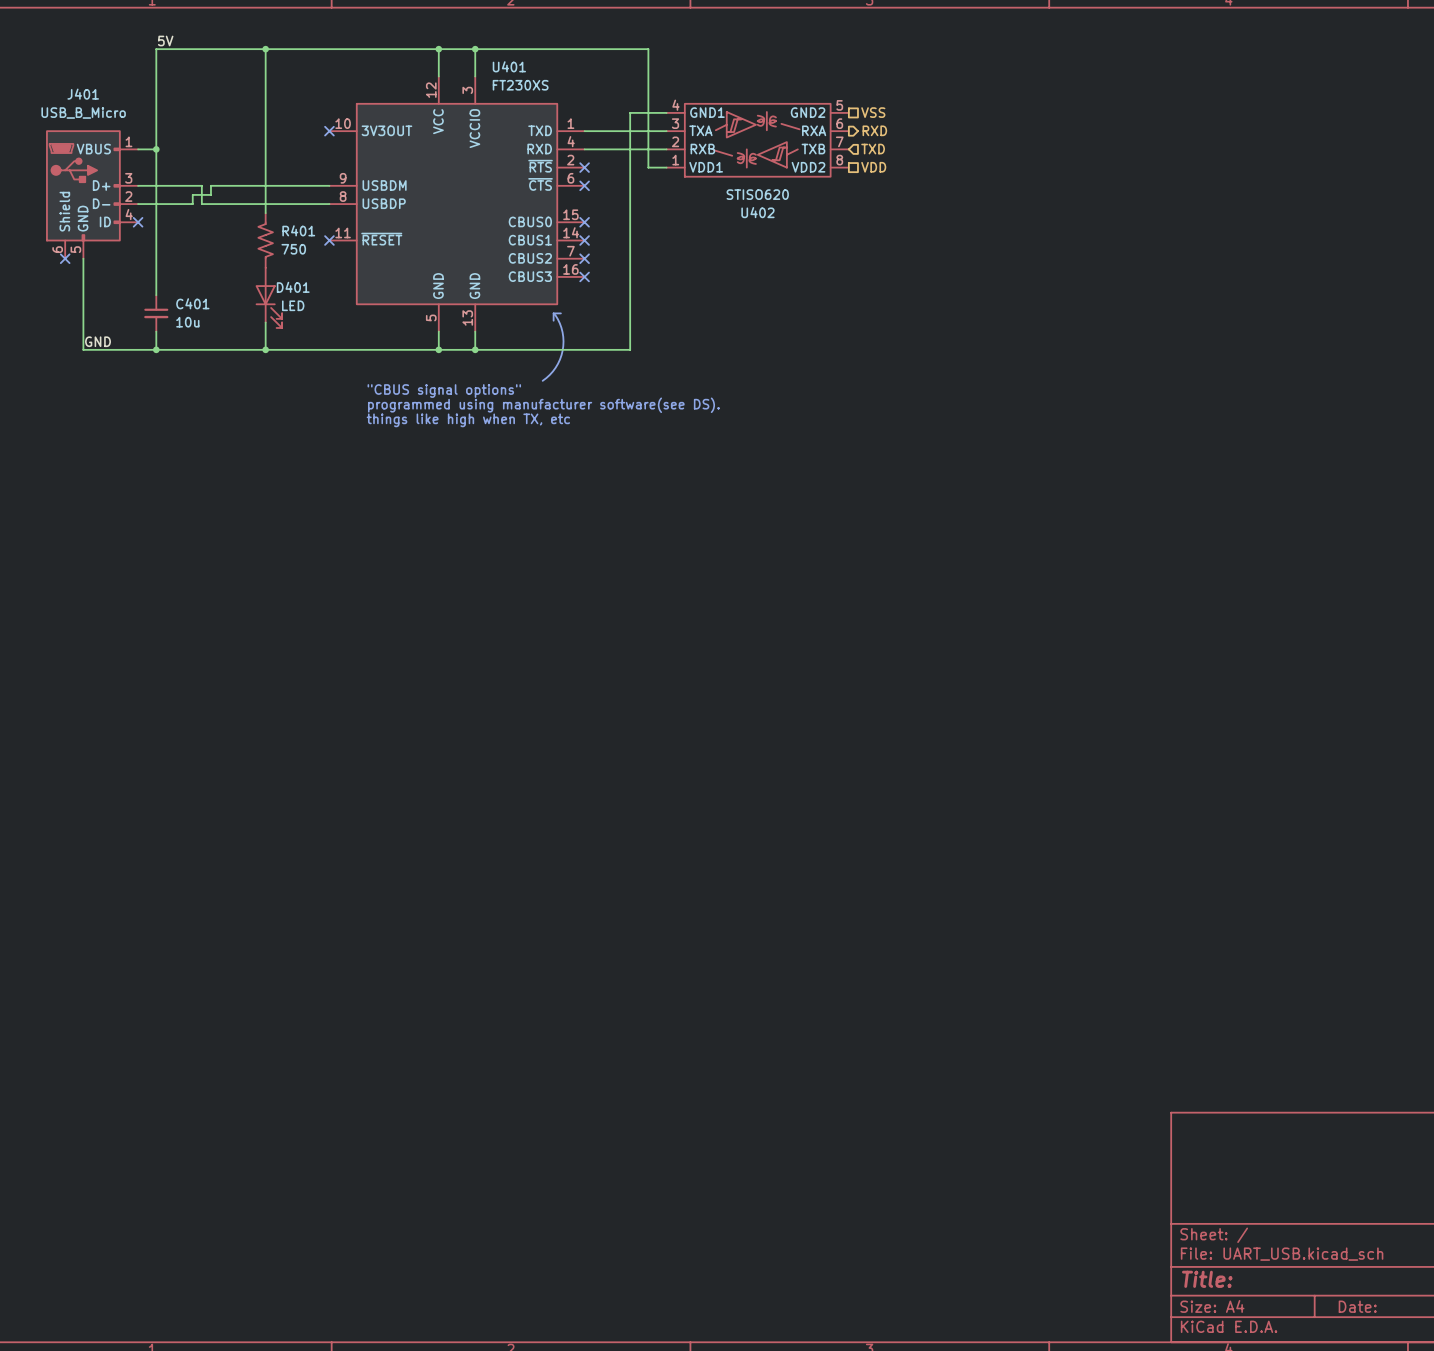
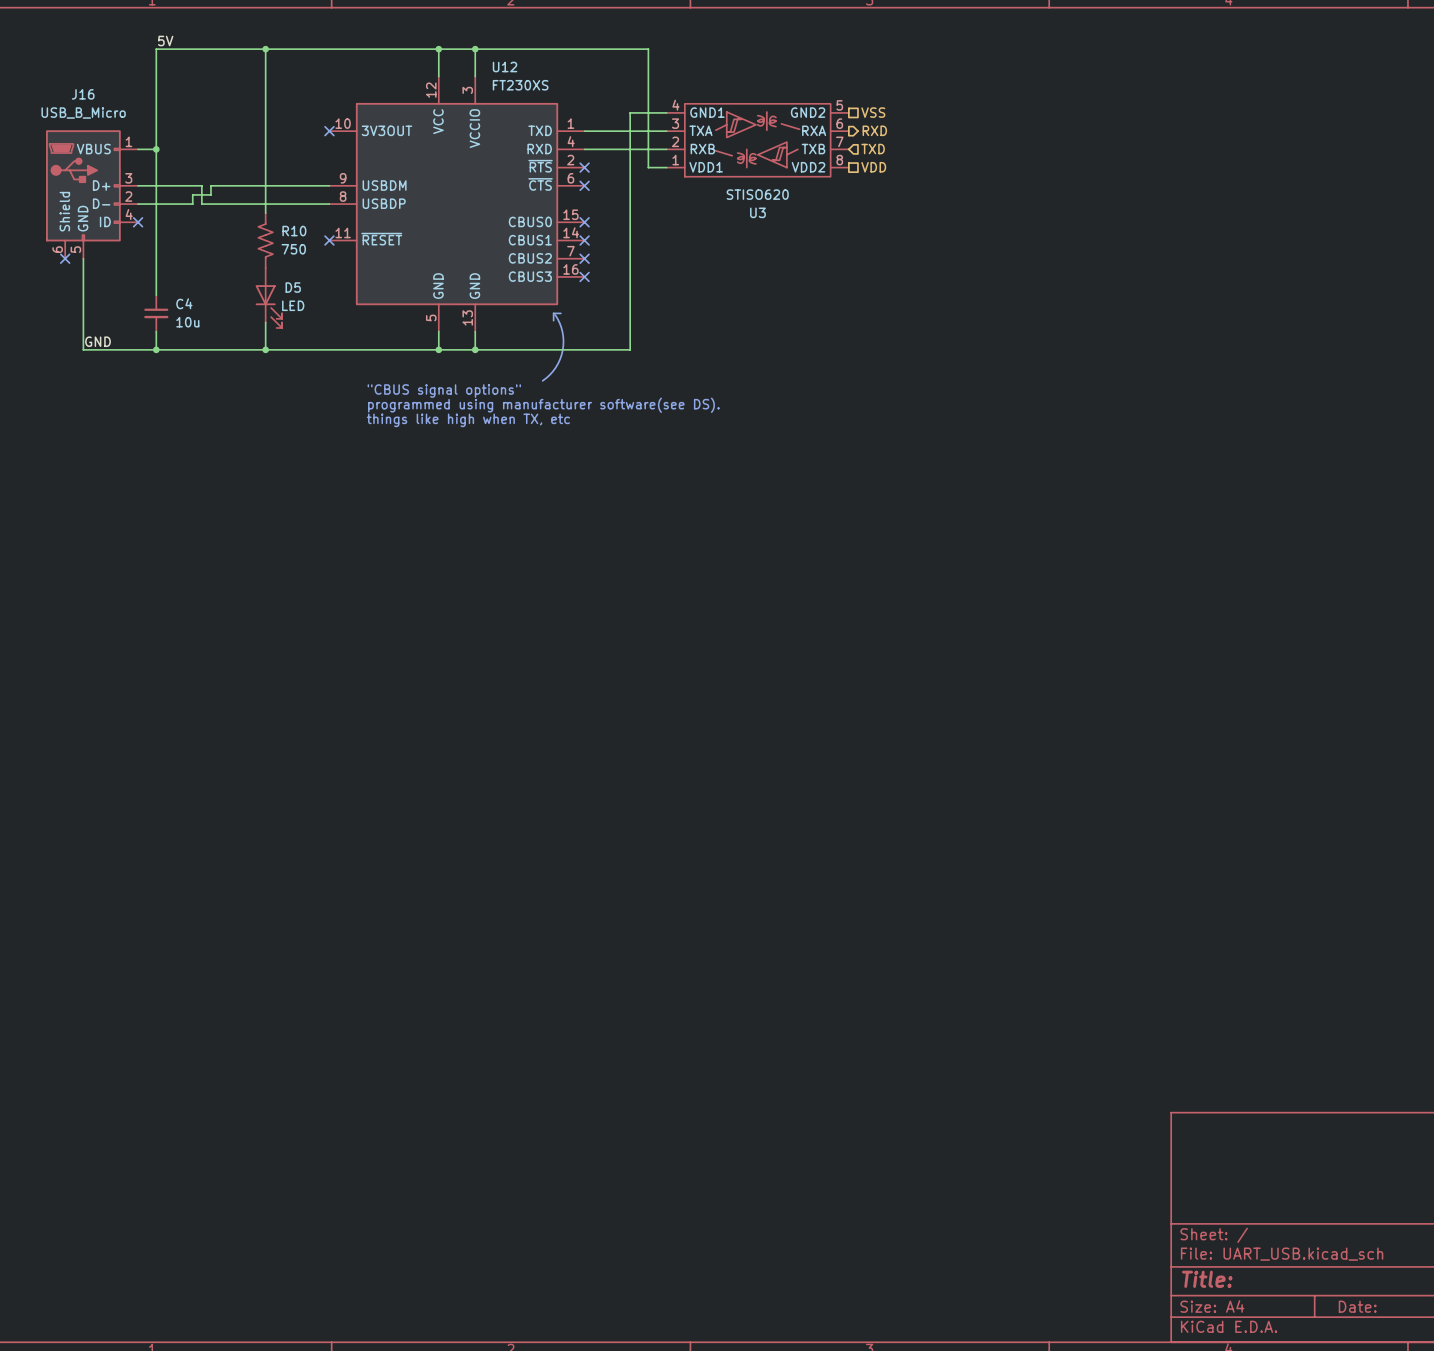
U401 name: U401 (509, 66) -> U12 (505, 67)
J401 name: J401 (83, 94) -> J16 (83, 94)
U402 name: U402 (757, 212) -> U3 (757, 212)
R401 name: R401 (298, 230) -> R10 (294, 231)
D401 name: D401 (293, 287) -> D5 (293, 287)
C401 name: C401 (192, 303) -> C4 (184, 303)

